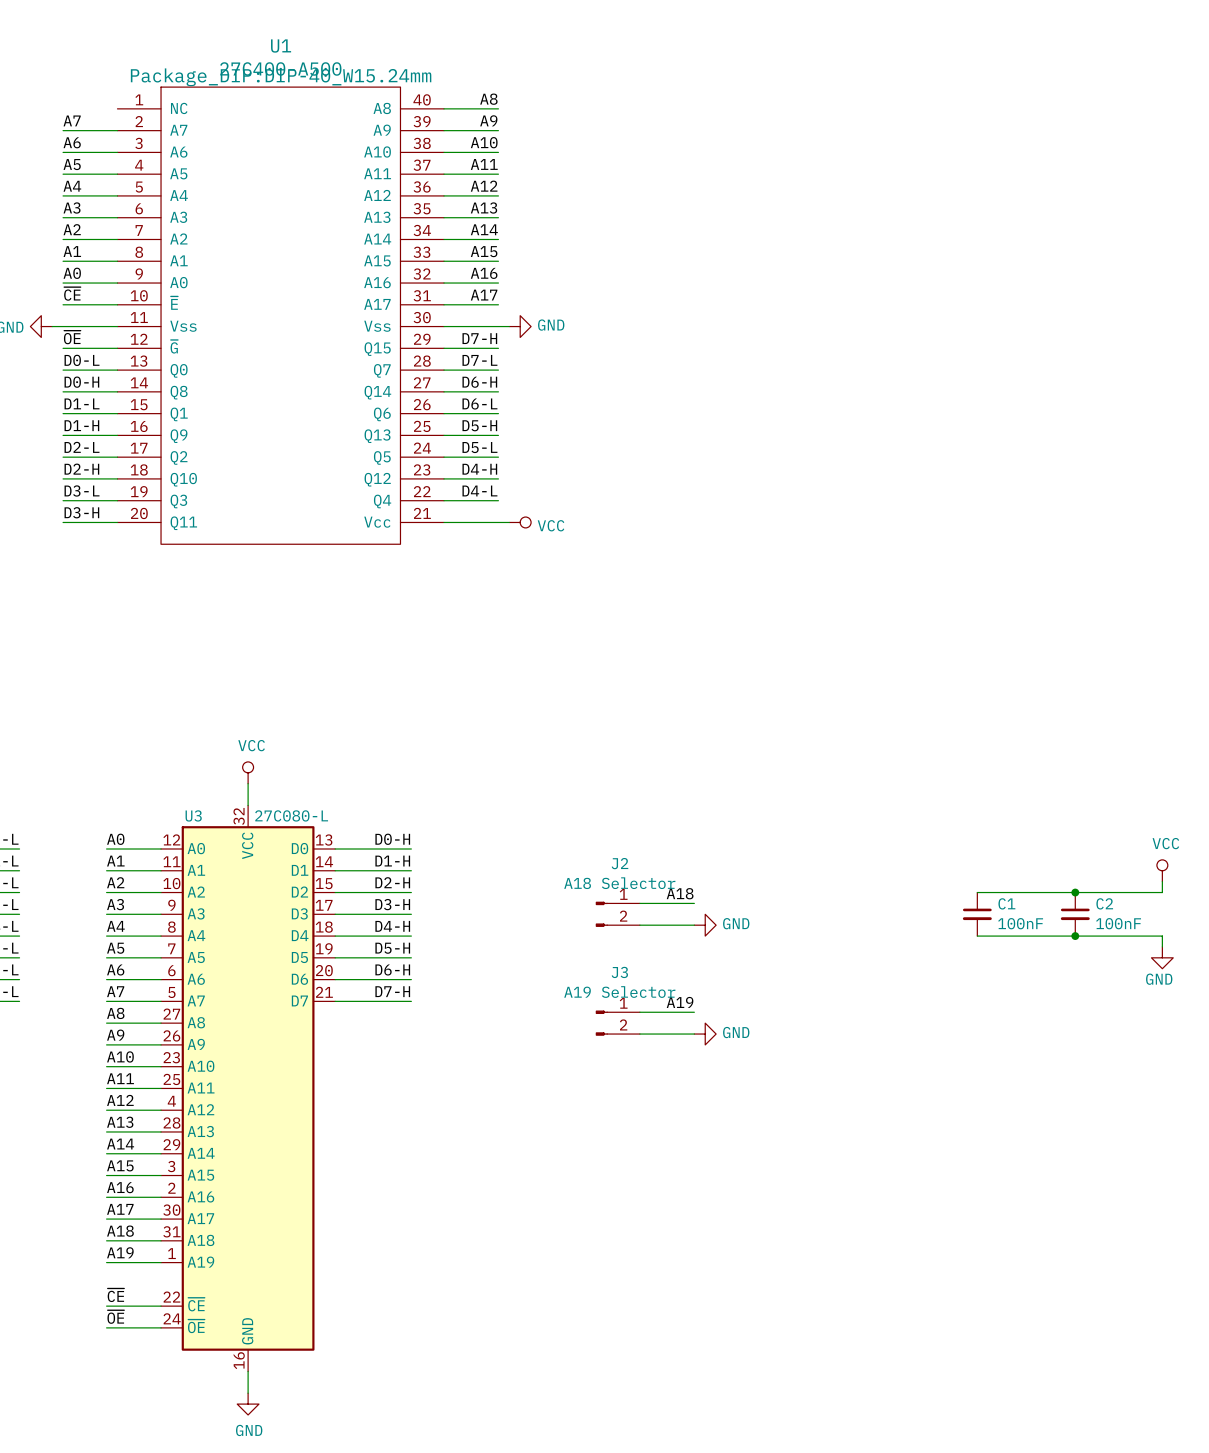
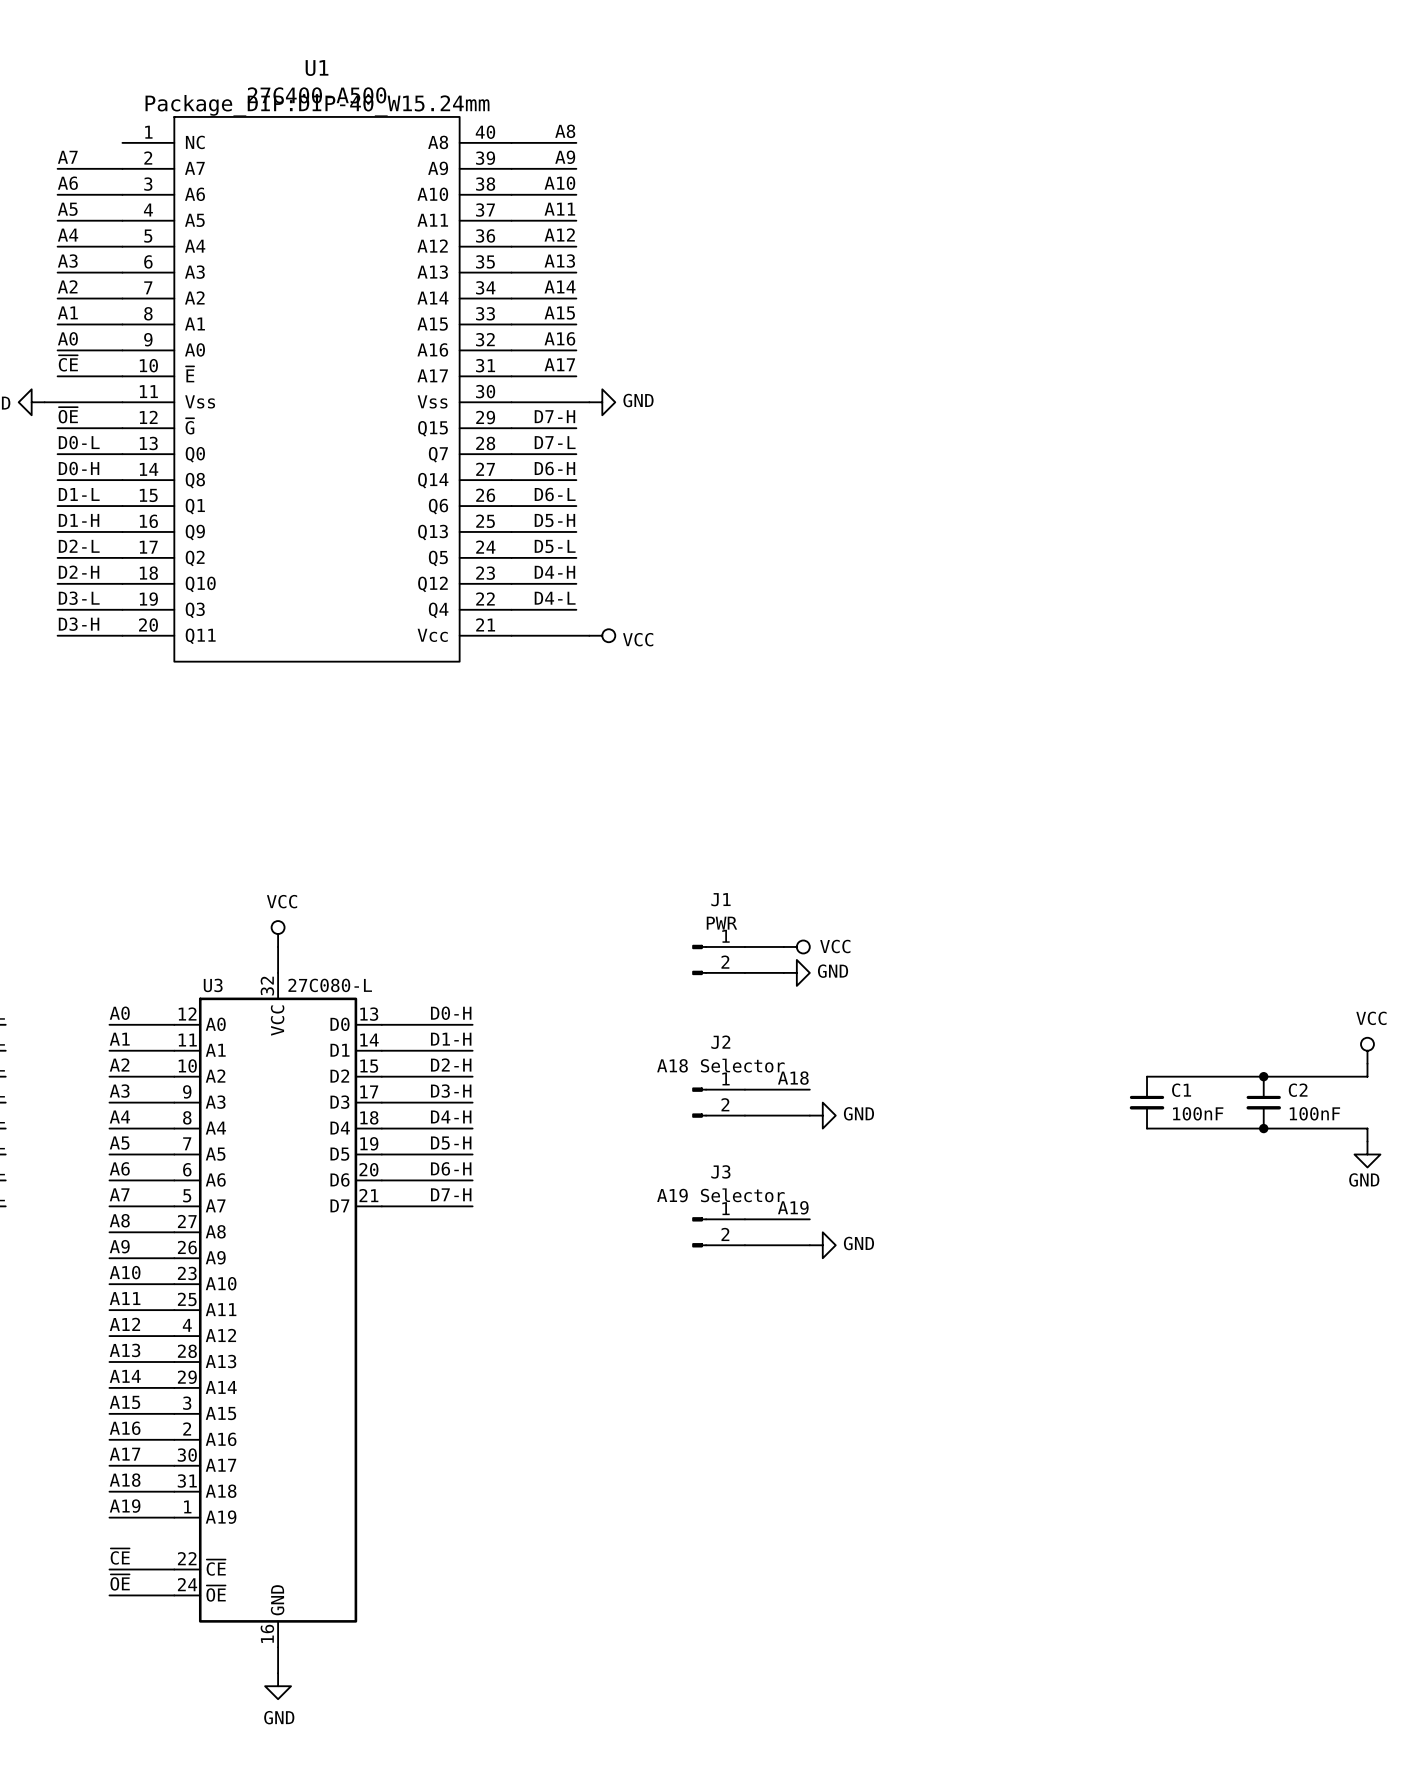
wire: none -> (744, 946) (783, 946)
power symbol: none -> VCC (796, 946)
J1: none -> PWR (718, 959)
wire: none -> (744, 972) (783, 972)
power symbol: none -> GND (796, 972)

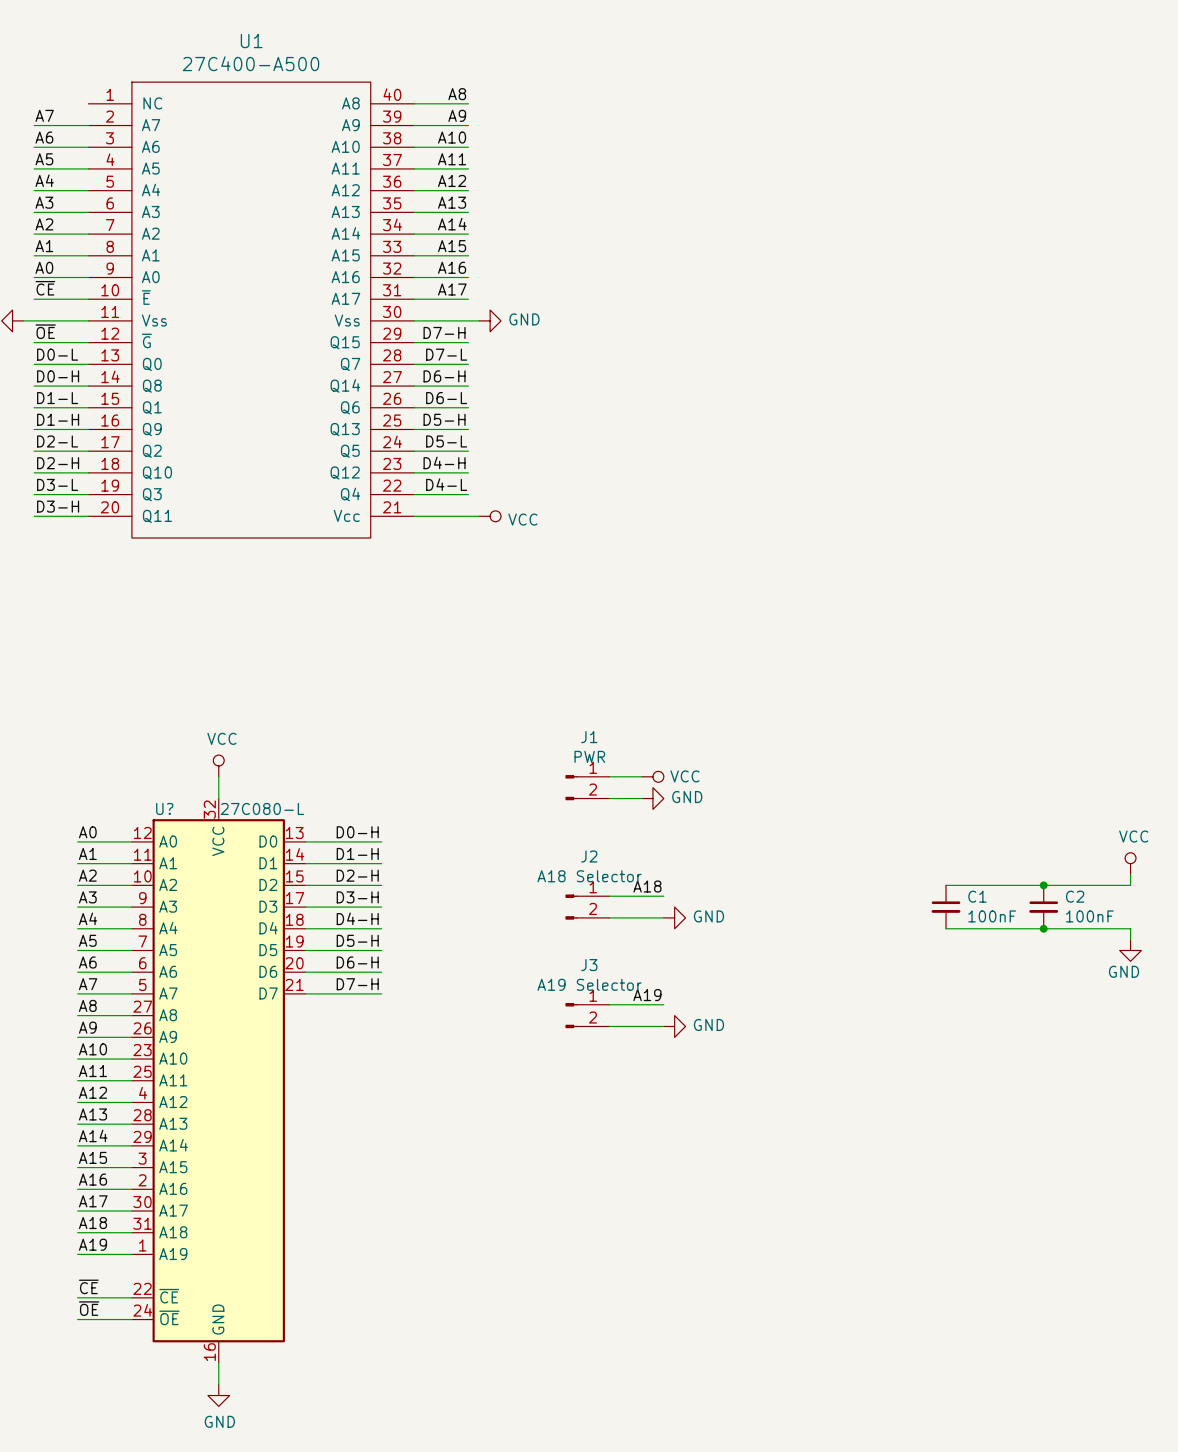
U1 text: Package_DIP:DIP-40_W15.24mm (317, 105) -> none
U3 name: U3 (213, 985) -> U? (164, 808)

